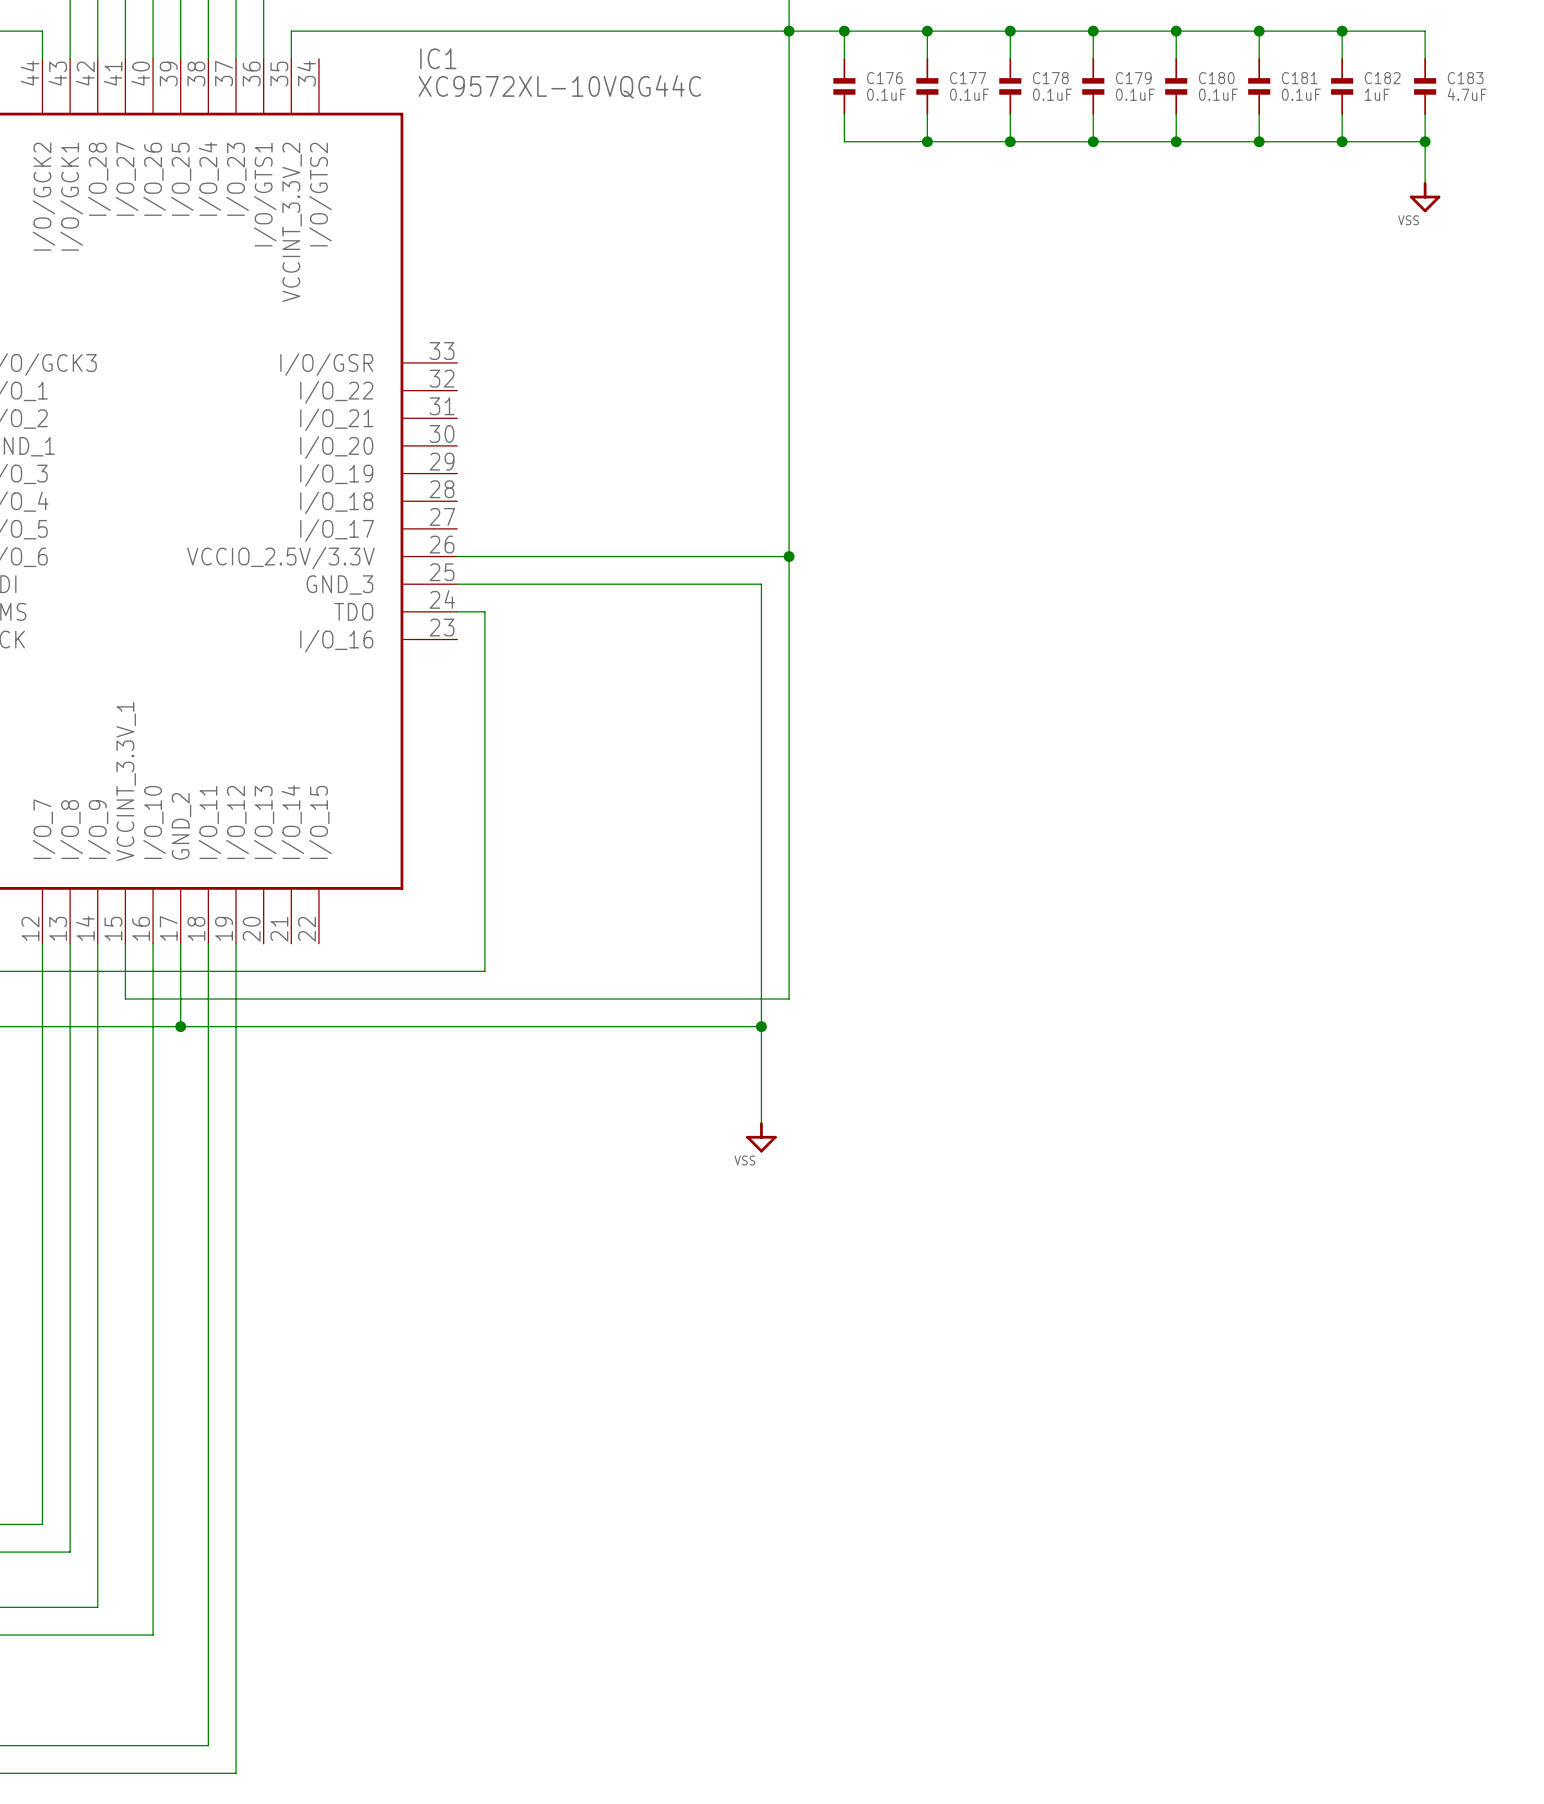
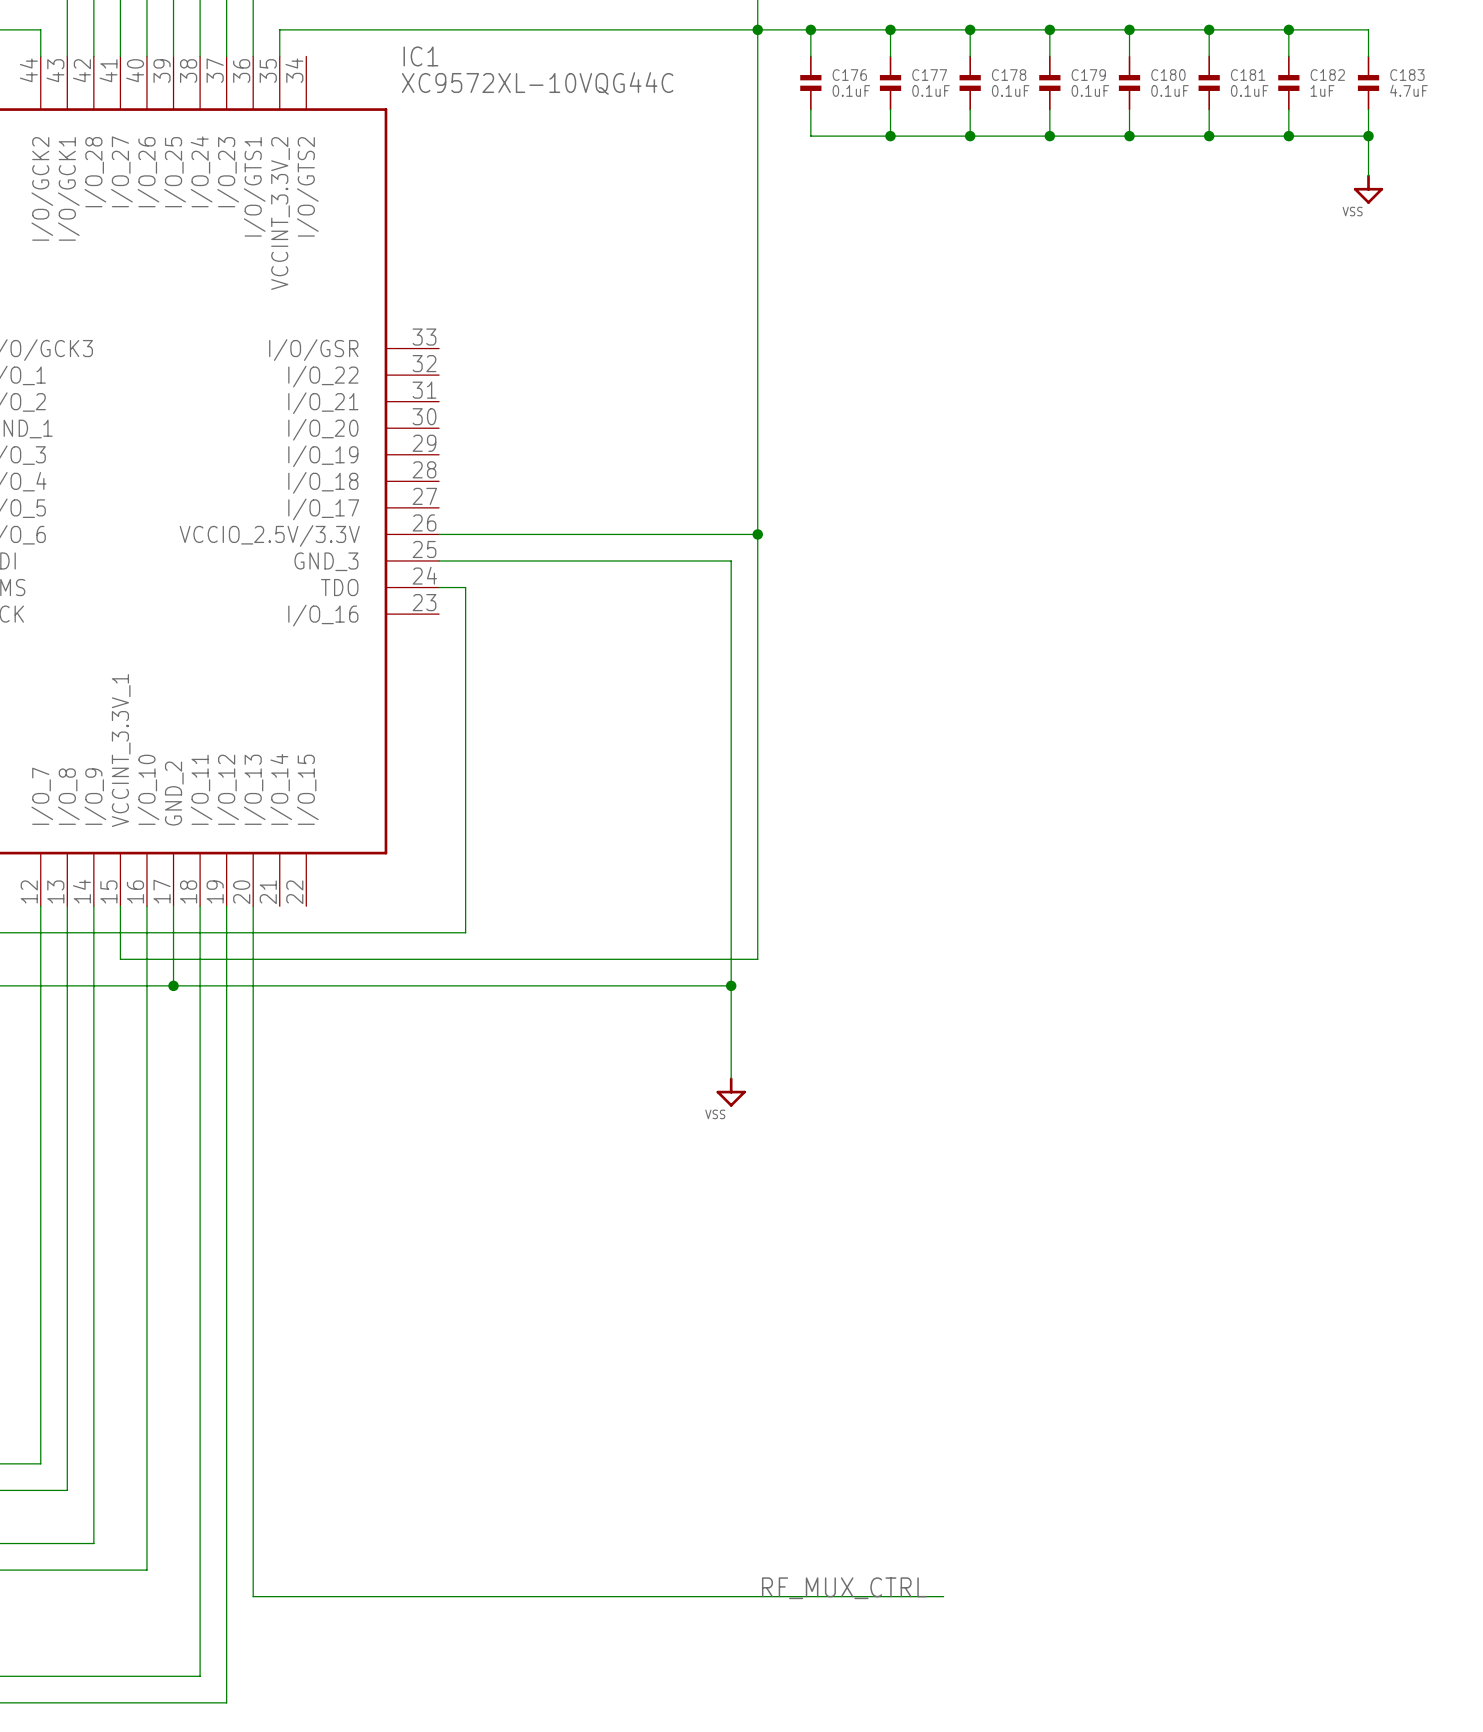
wire: none -> (253, 906) (253, 1596) (943, 1596)
label: none -> RF_MUX_CTRL (844, 1588)

